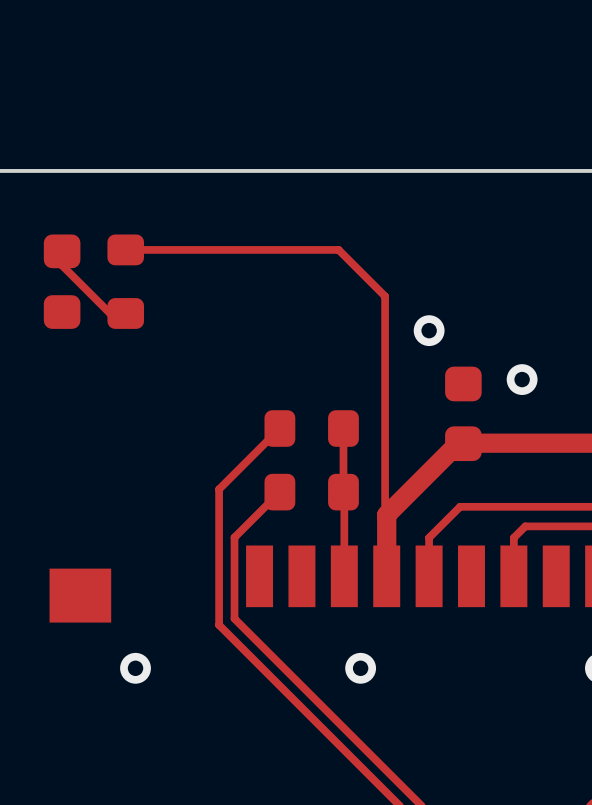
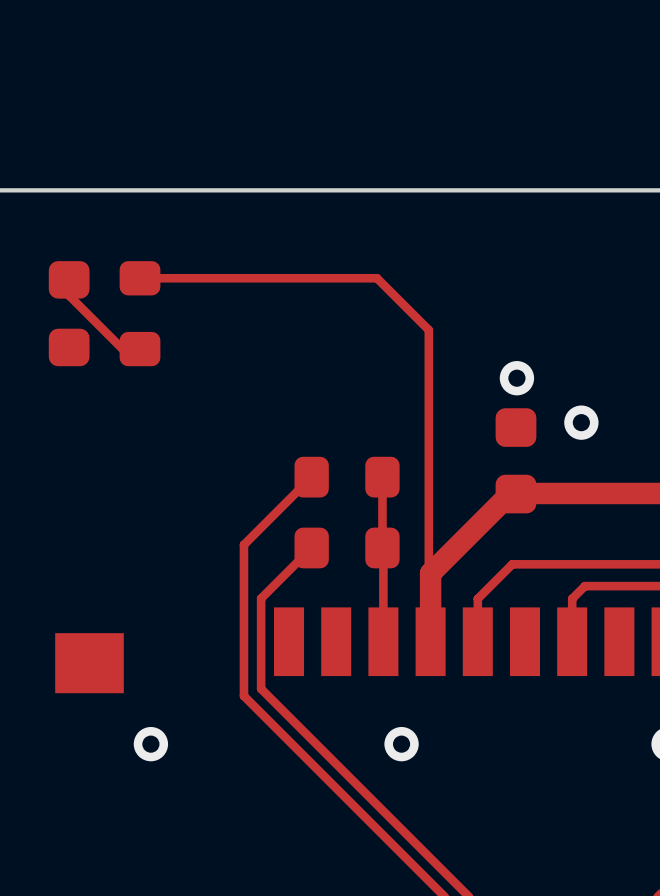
via position: (429, 330) -> (516, 378)

